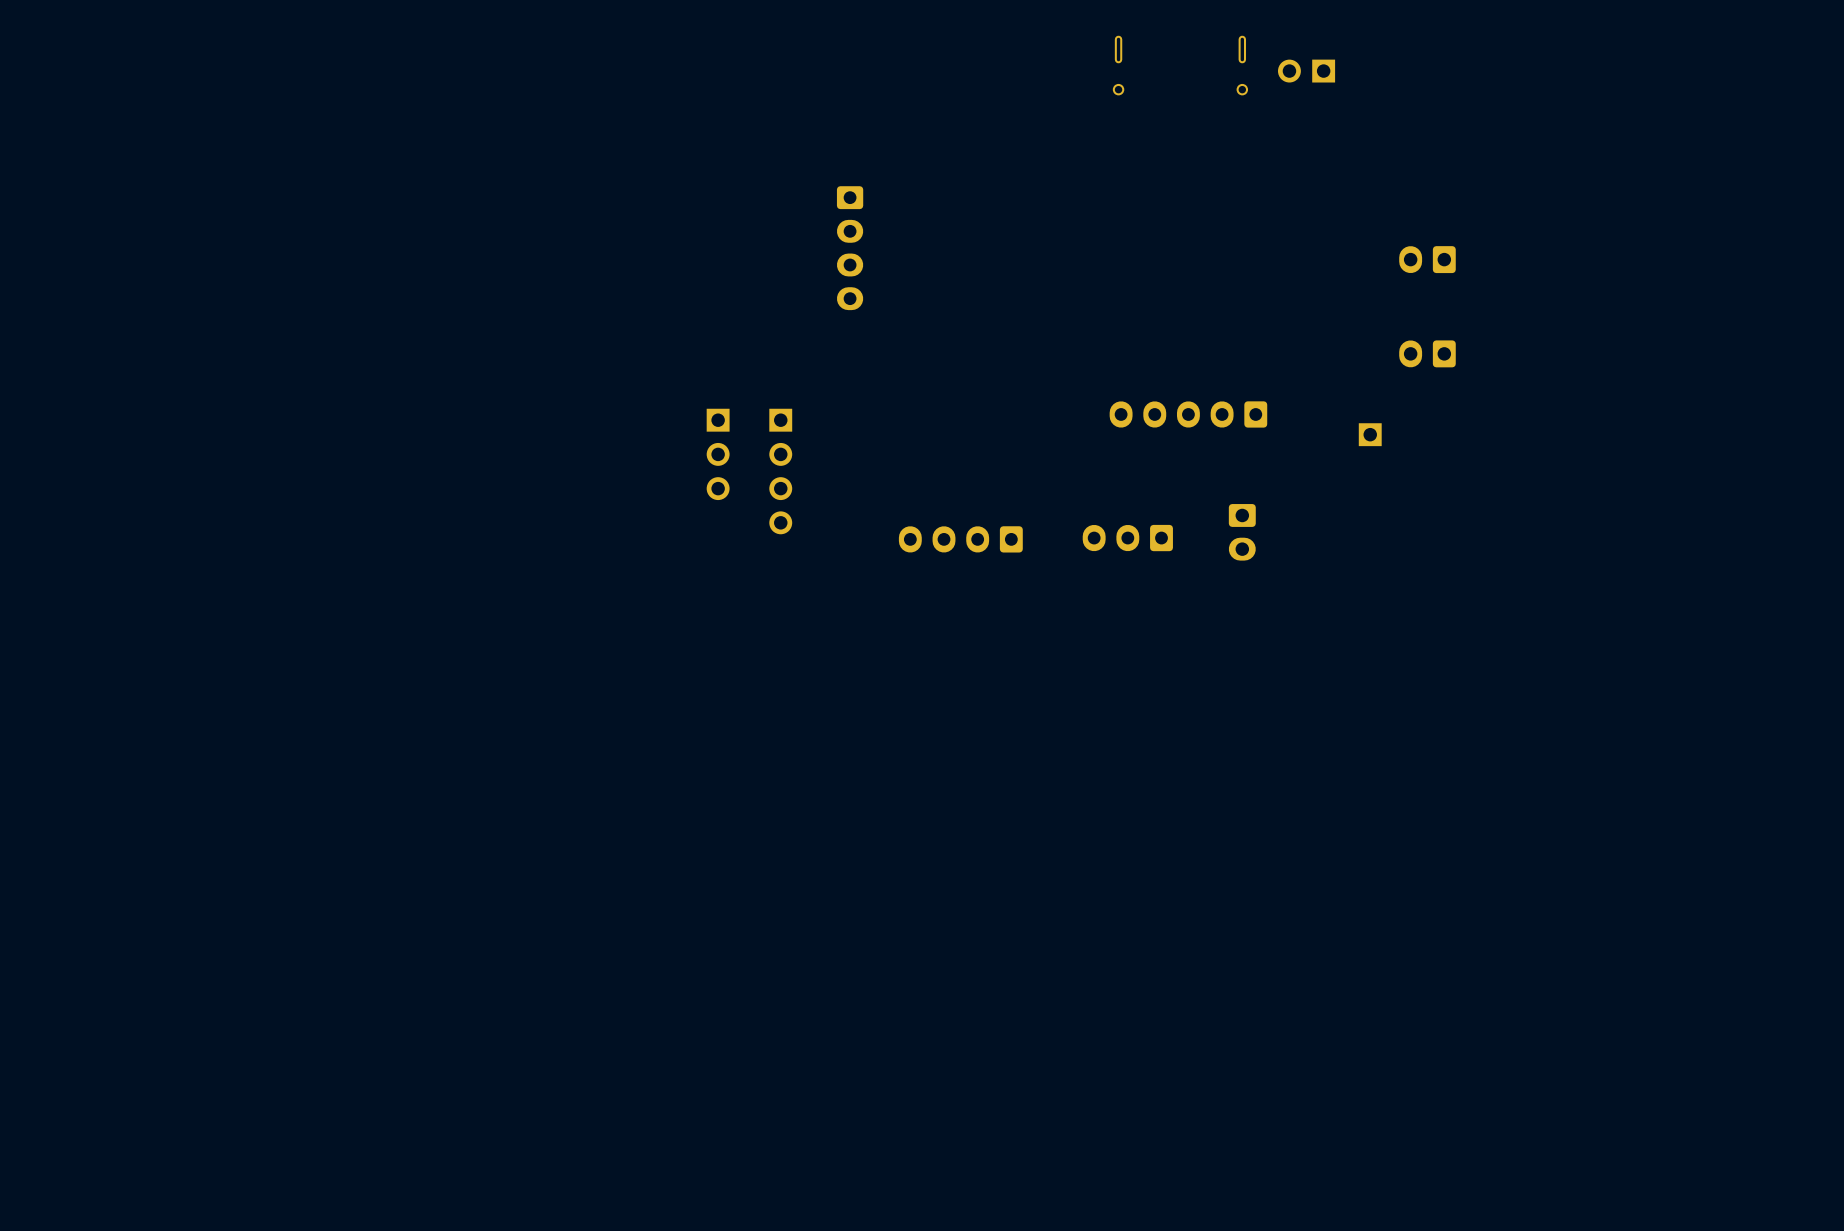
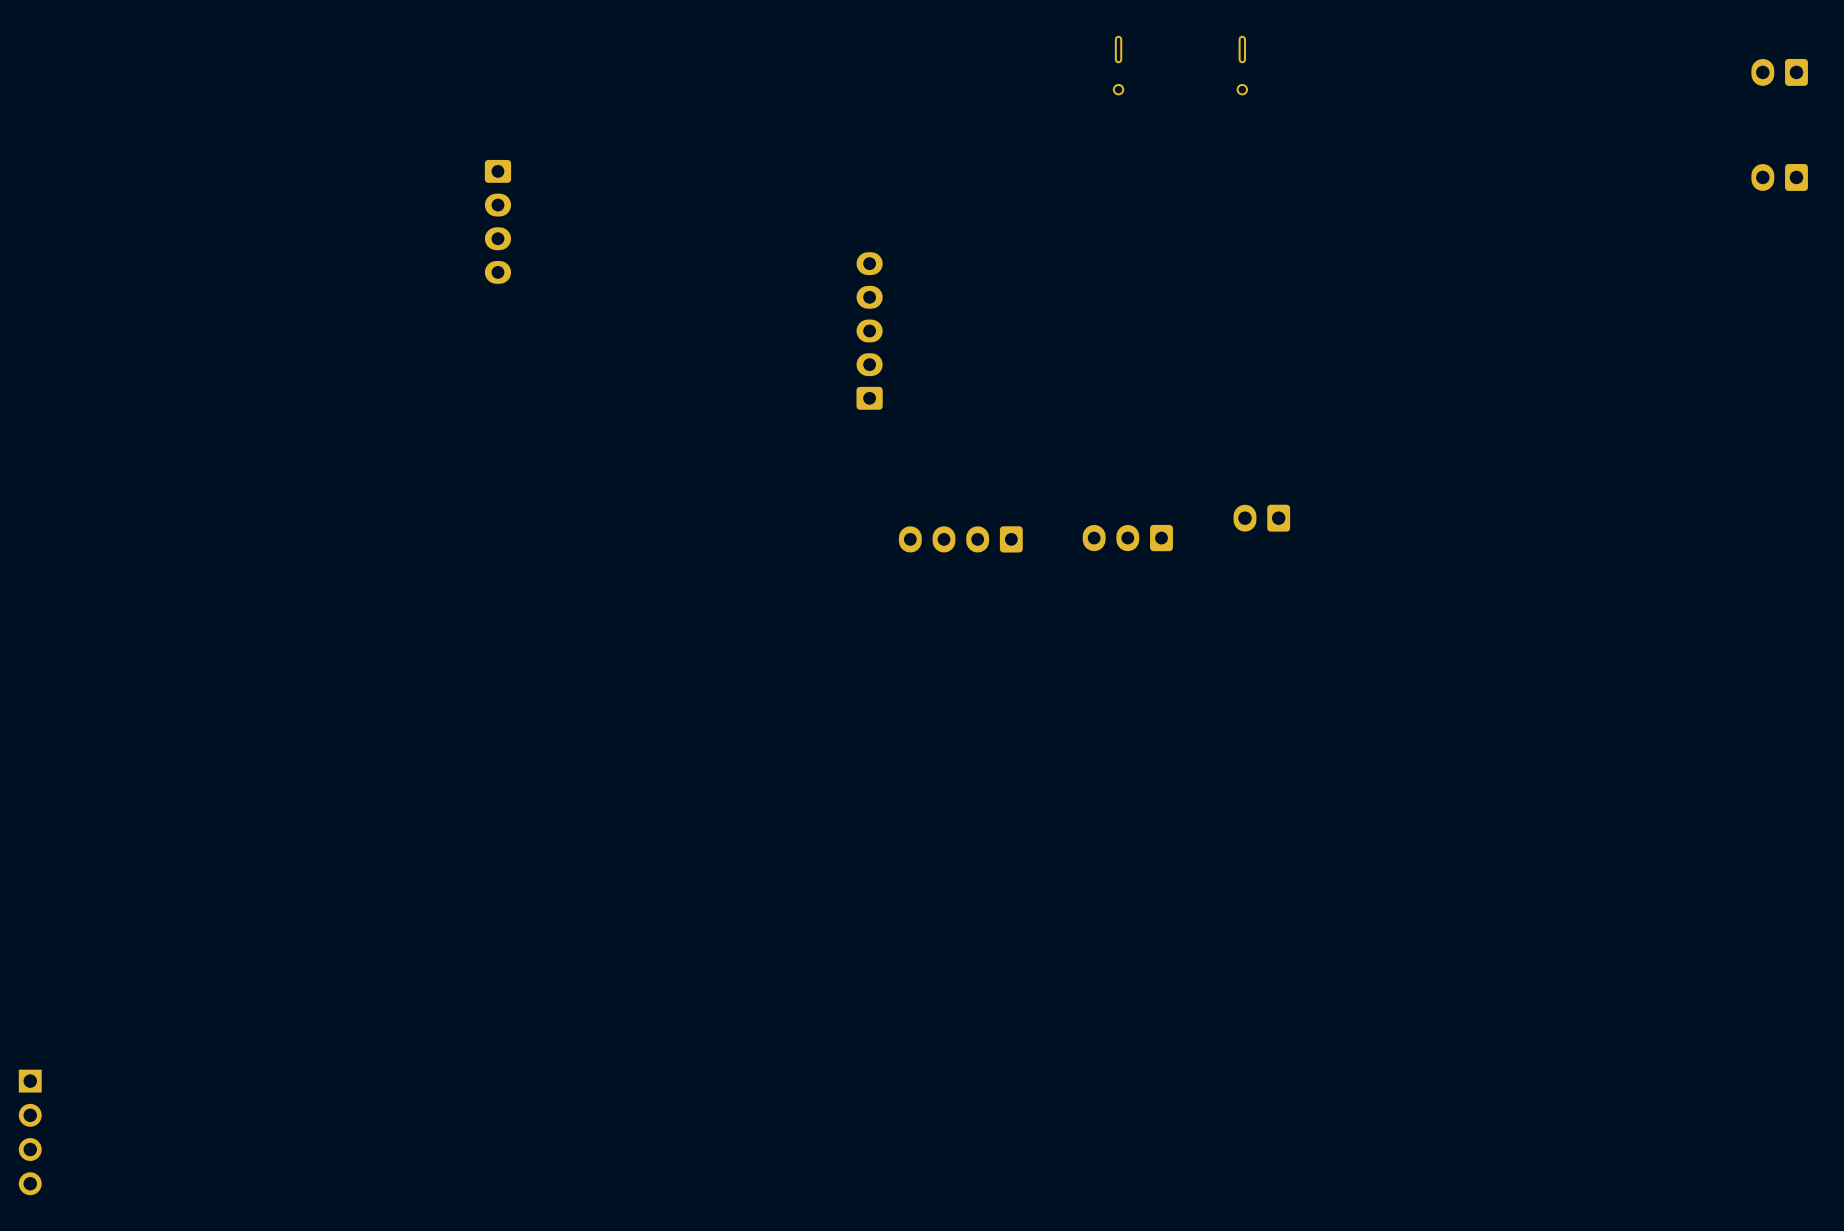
part: (1306, 71) -> none
part: none -> (1779, 72)
part: none -> (1779, 177)
part: none -> (497, 221)
part: (850, 248) -> none
part: (1427, 259) -> none
part: (1427, 353) -> none
part rotation: 0° (1188, 414) -> 90° clockwise (869, 330)
part position: (1188, 414) -> (869, 330)
part: (1370, 434) -> none
part: (718, 454) -> none
part: (780, 471) -> none
part rotation: 0° (1242, 532) -> 90° clockwise (1261, 518)
part: none -> (30, 1132)

